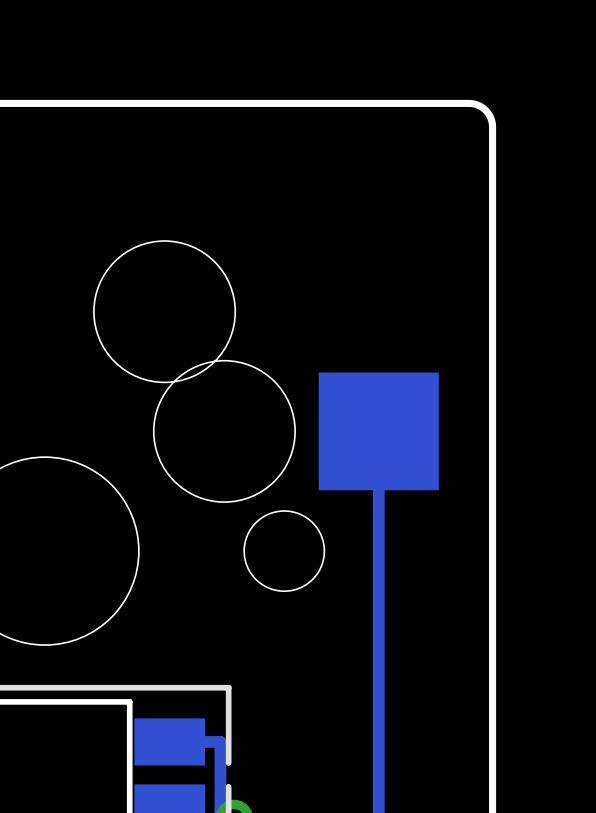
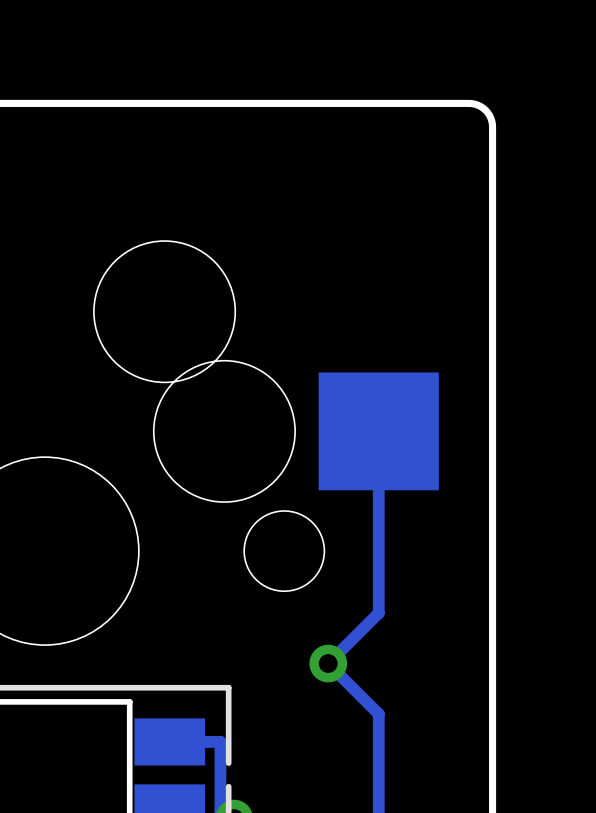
track: (378, 613) (378, 714) -> (378, 613) (328, 663) (378, 714)
via: none -> (328, 663)

